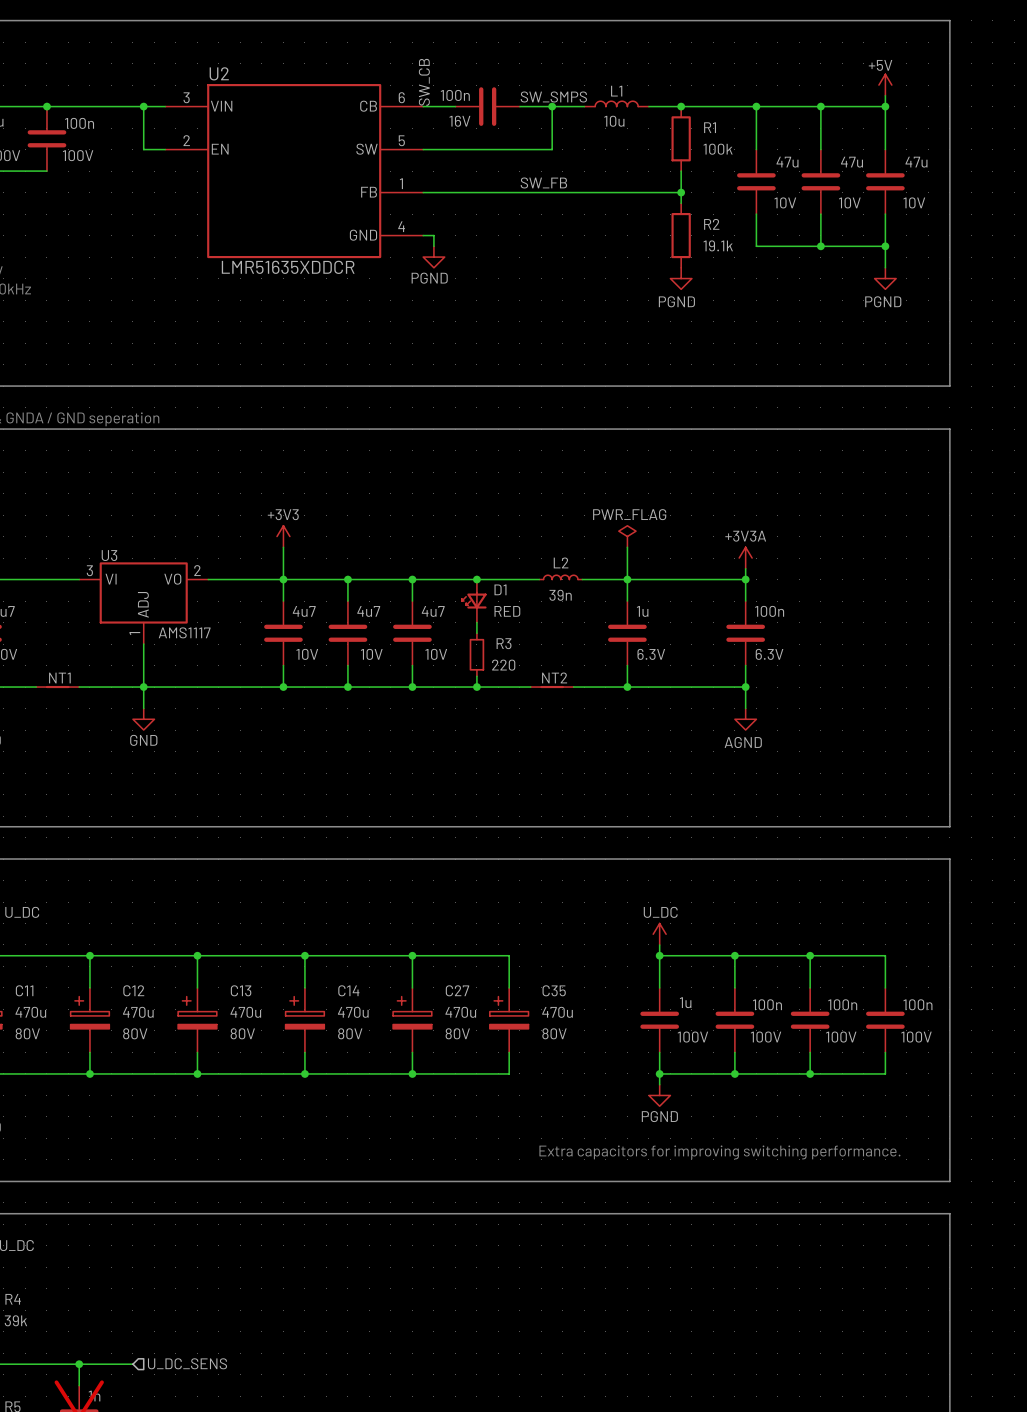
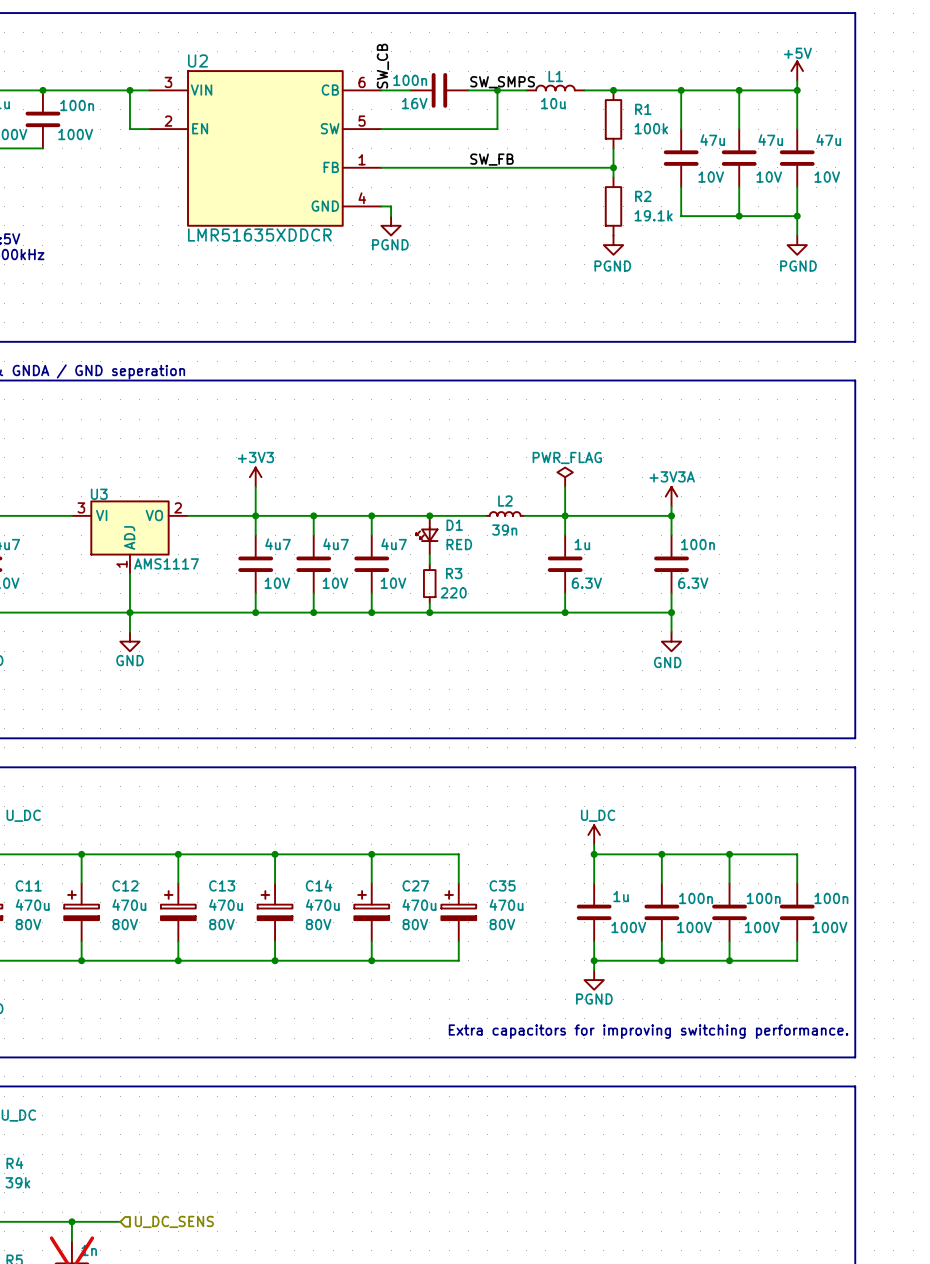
NT1: (57, 687) -> none
NT2: (552, 687) -> none
power symbol: AGND (745, 719) -> GND (671, 641)

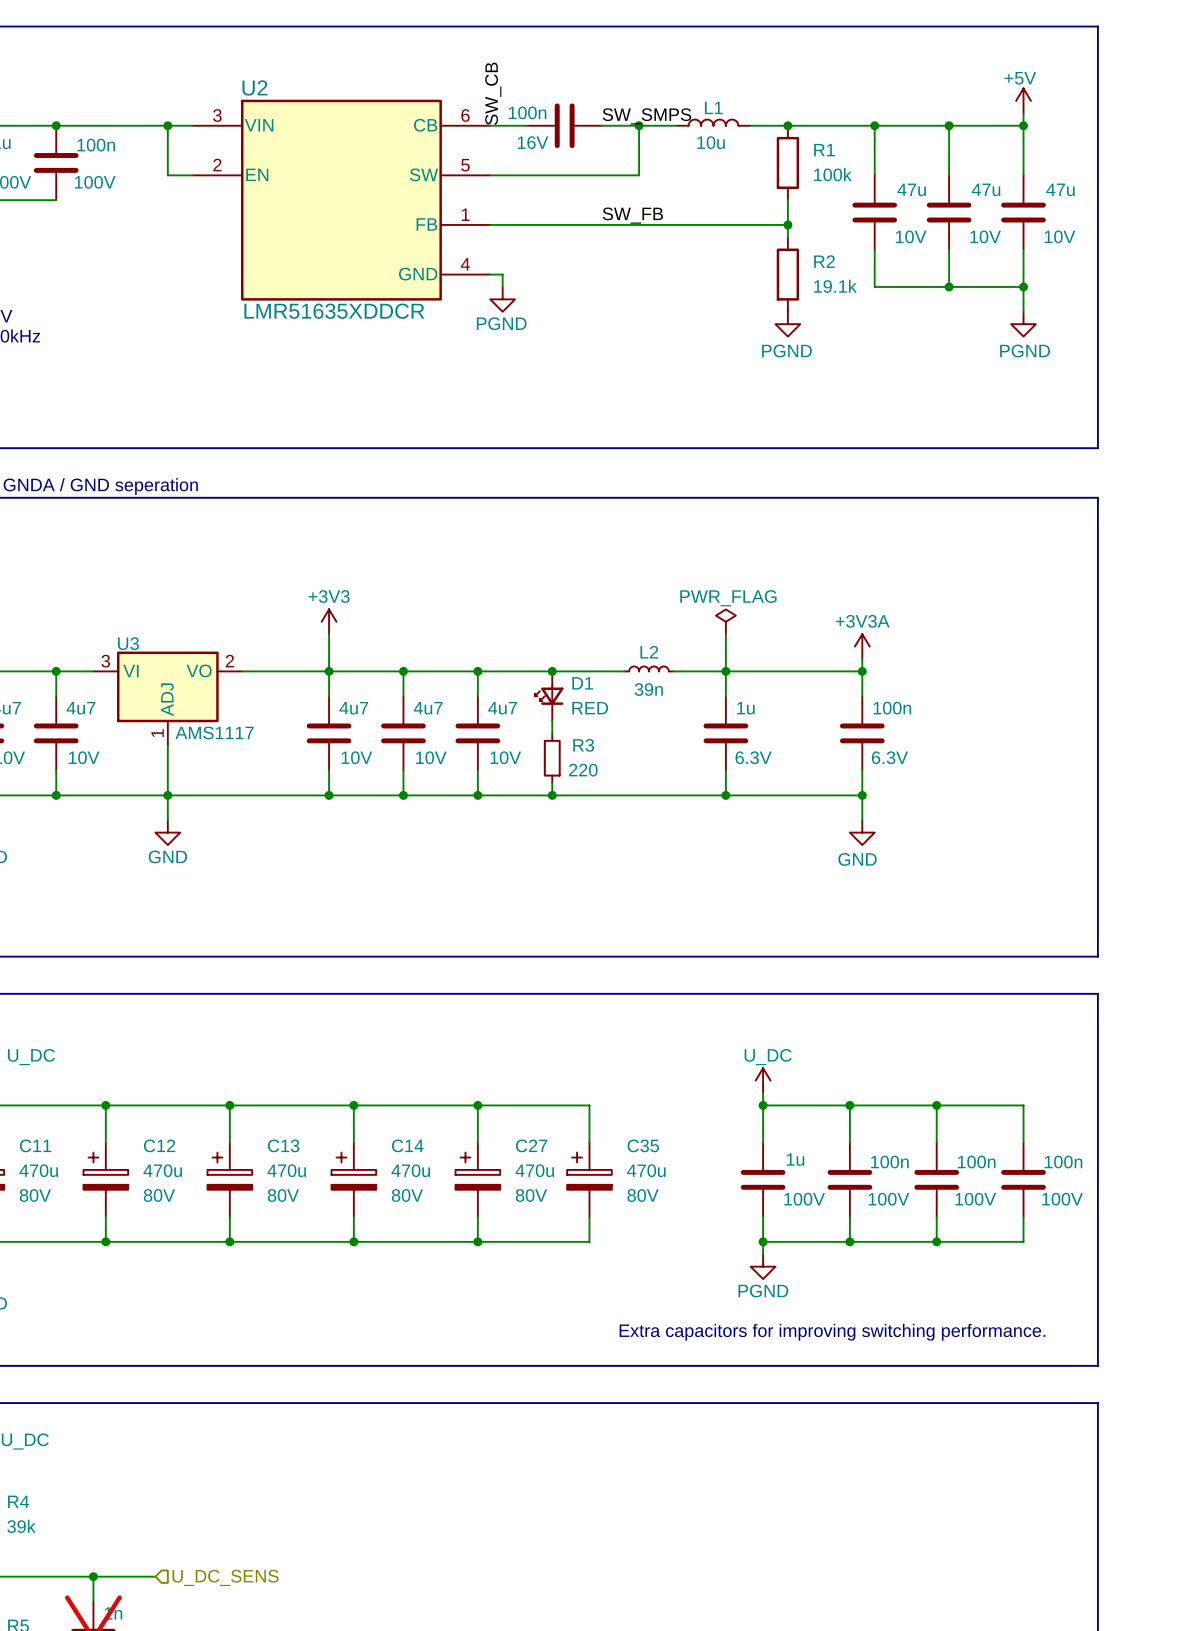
wire: none -> (56, 671) (56, 696)
junction: none -> (56, 671)
part: none -> 4u7 (56, 733)
wire: none -> (56, 770) (56, 795)
junction: none -> (56, 795)

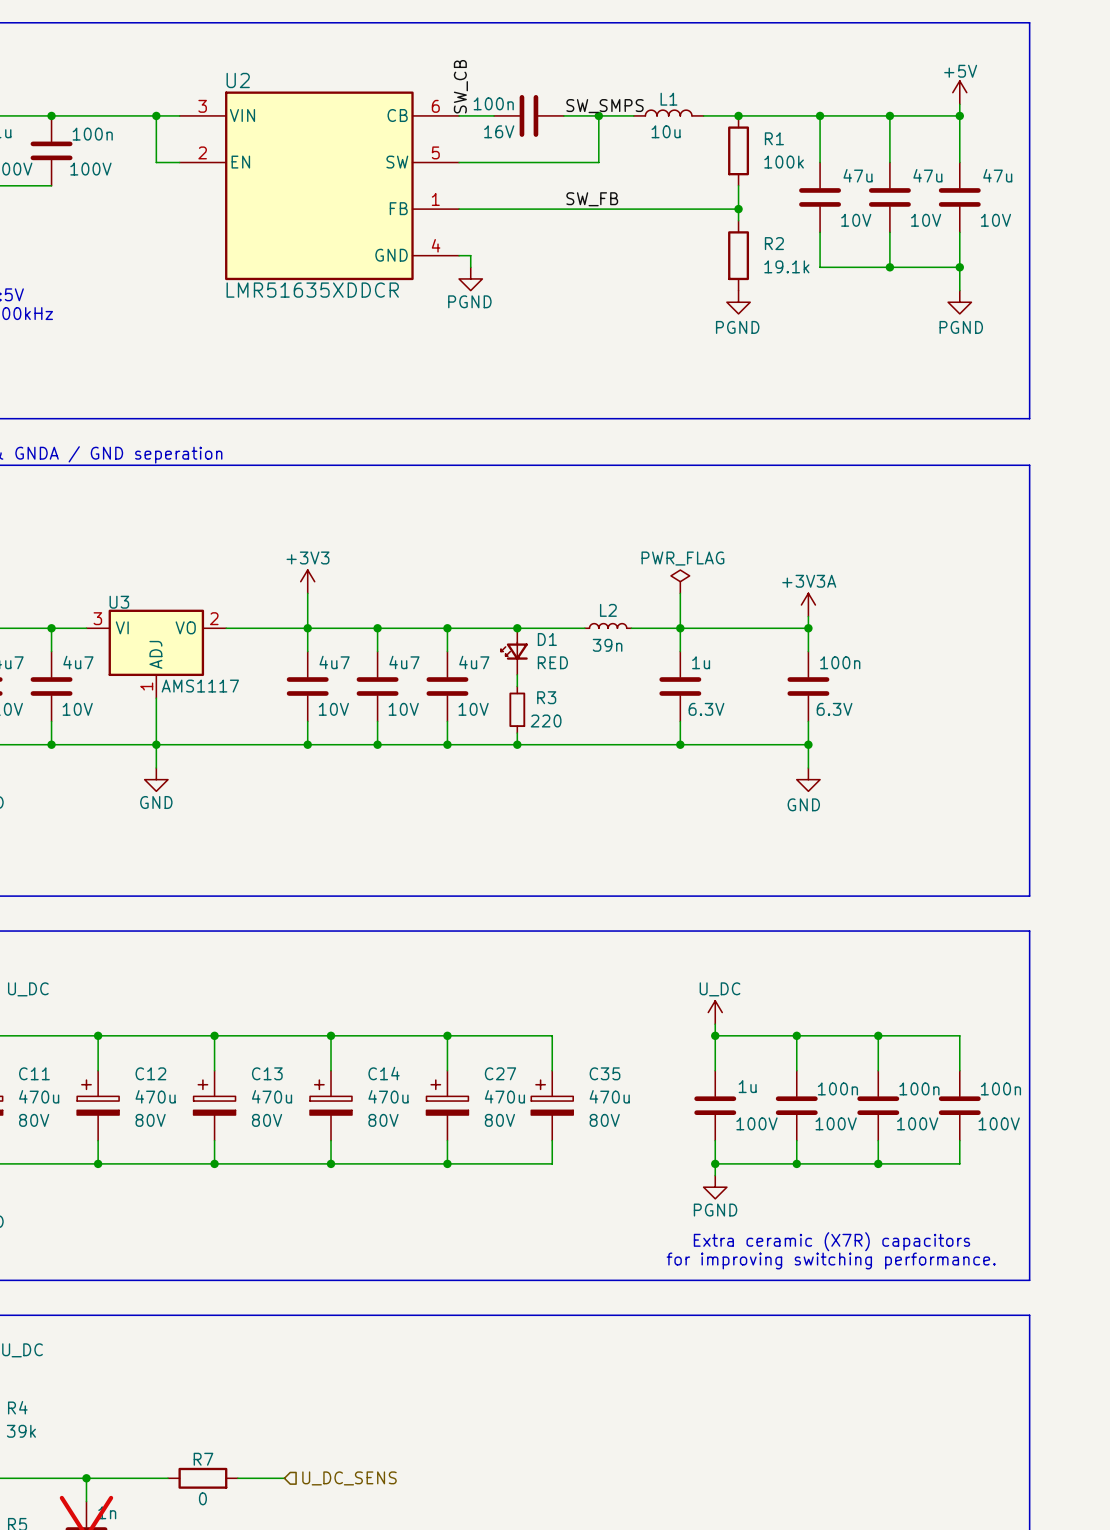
text: none -> Extra ceramic (X7R) capacitors (831, 1241)
text: Extra capacitors for improving switching performance. (832, 1332) -> for improving switching performance. (831, 1260)
wire: none -> (144, 1478) (167, 1478)
R7: none -> (202, 1478)
wire: none -> (237, 1478) (284, 1478)
hierarchical label position: U_DC_SENS (225, 1577) -> U_DC_SENS (349, 1478)

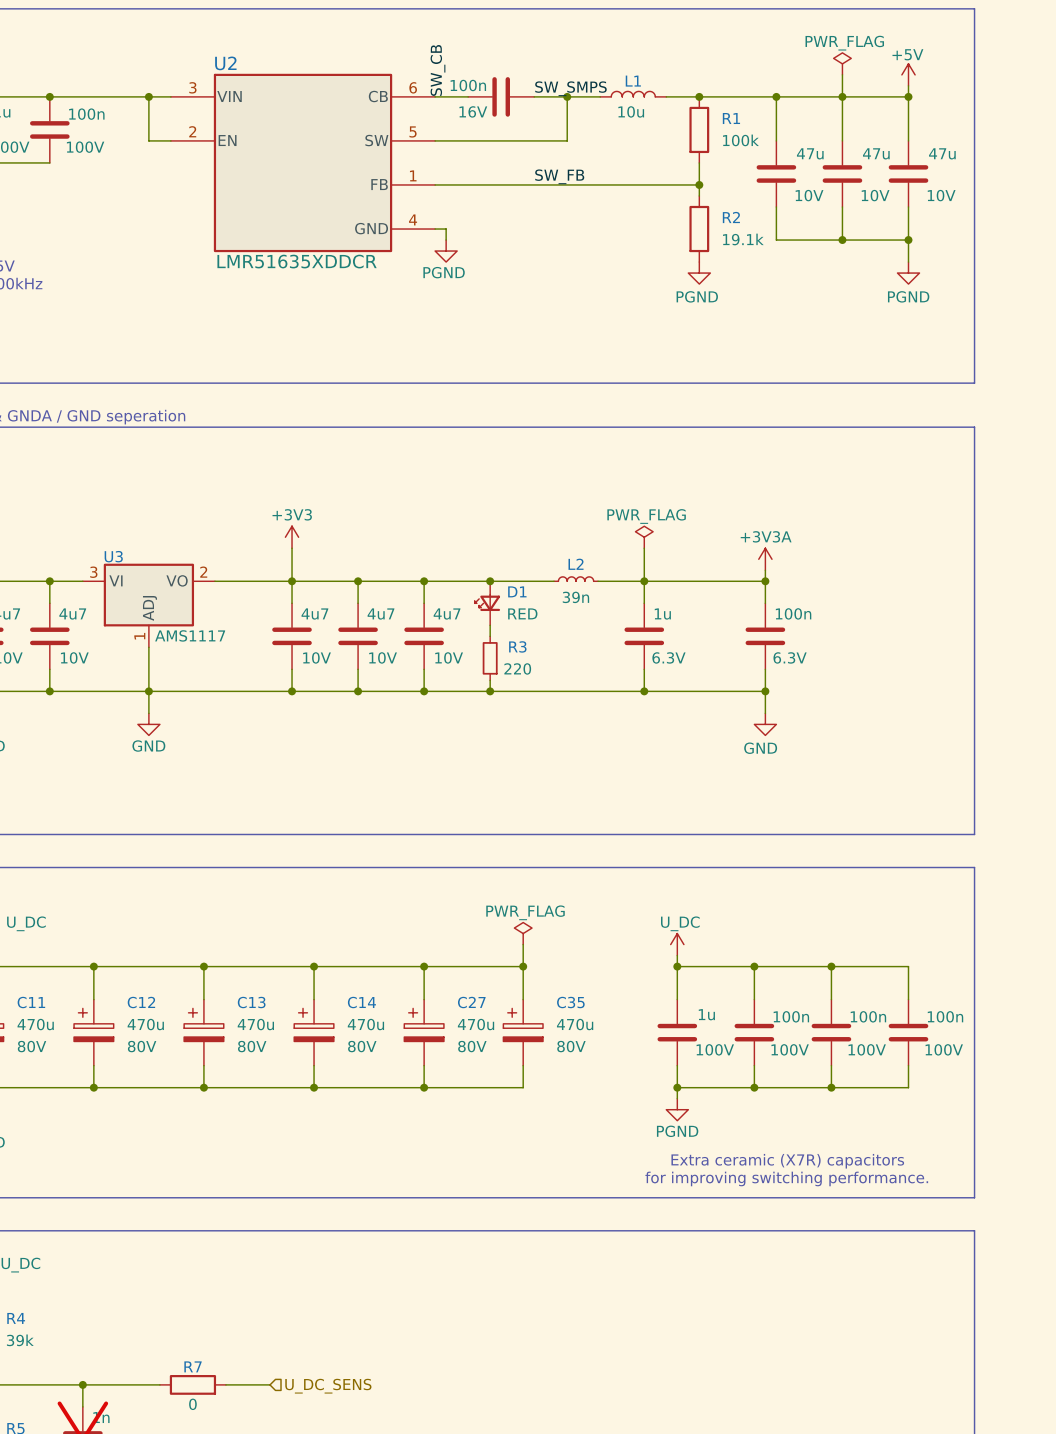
power symbol: none -> PWR_FLAG (842, 63)
wire: none -> (842, 74) (842, 96)
power symbol: none -> PWR_FLAG (523, 933)
wire: none -> (523, 944) (523, 966)
junction: none -> (523, 966)

